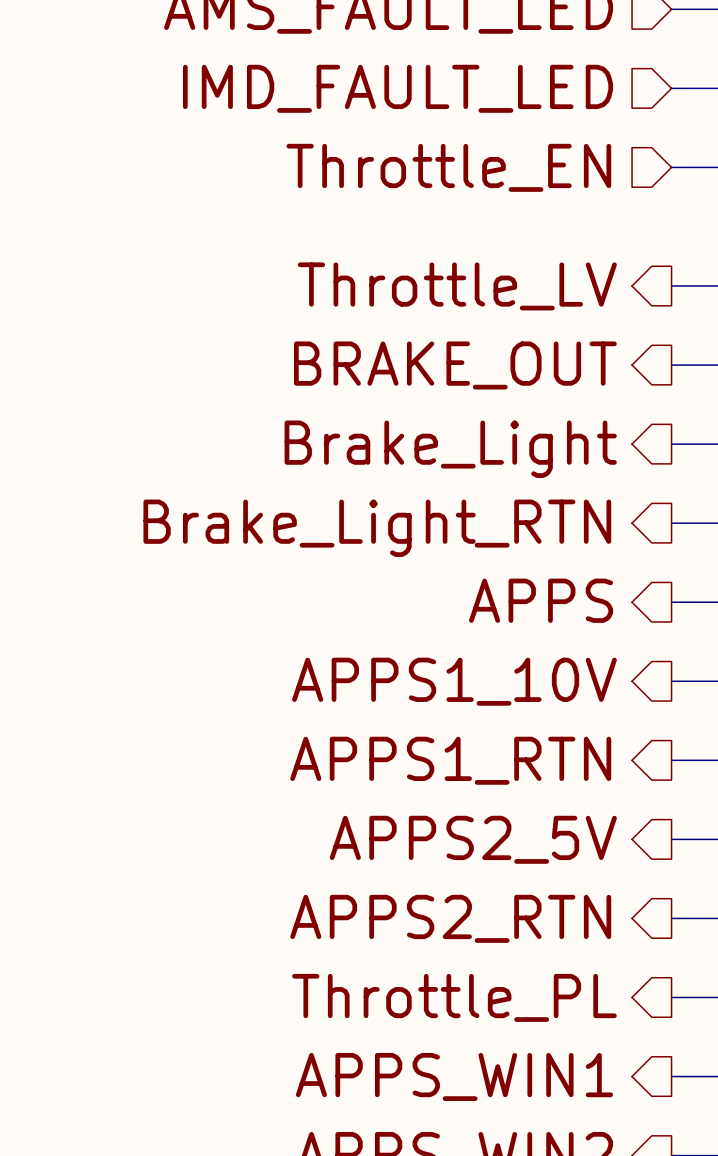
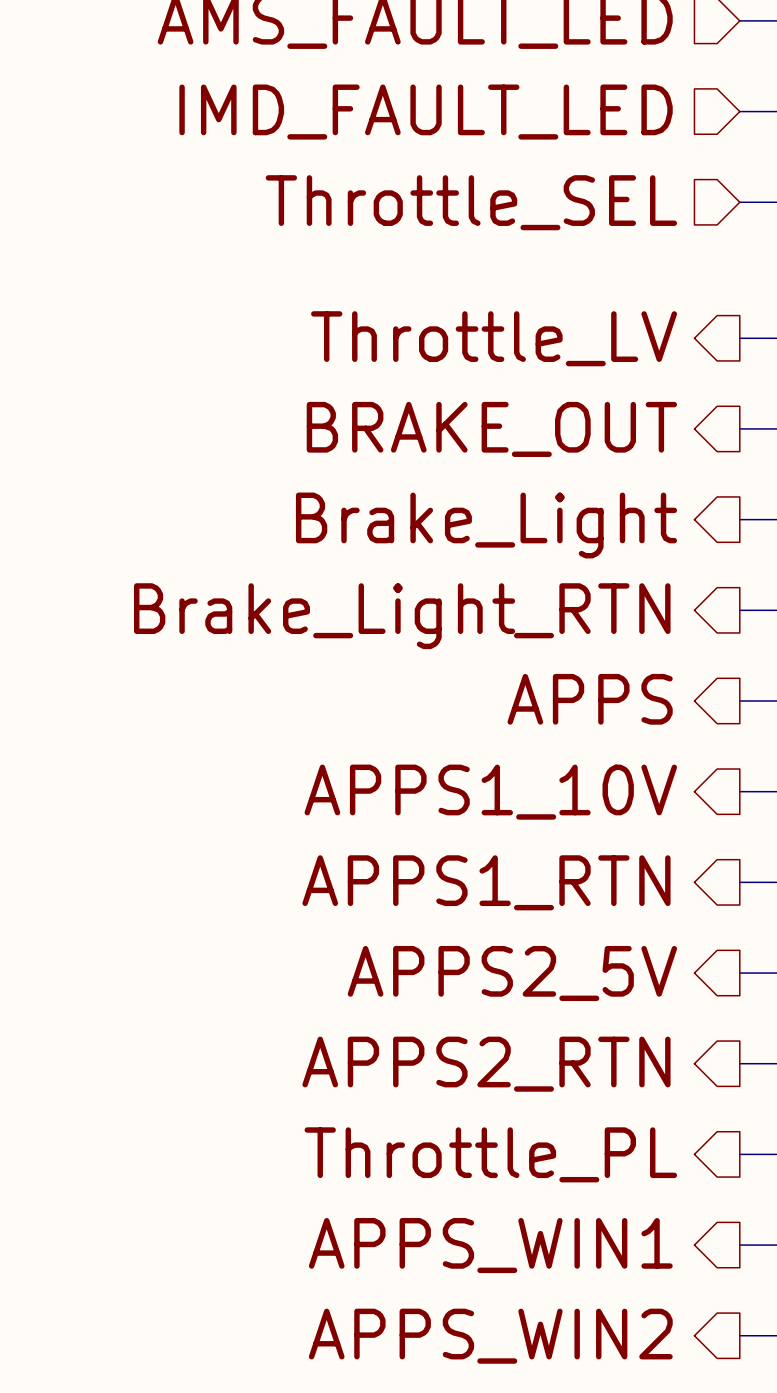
hierarchical label: Throttle_EN (448, 167) -> Throttle_SEL (471, 202)

